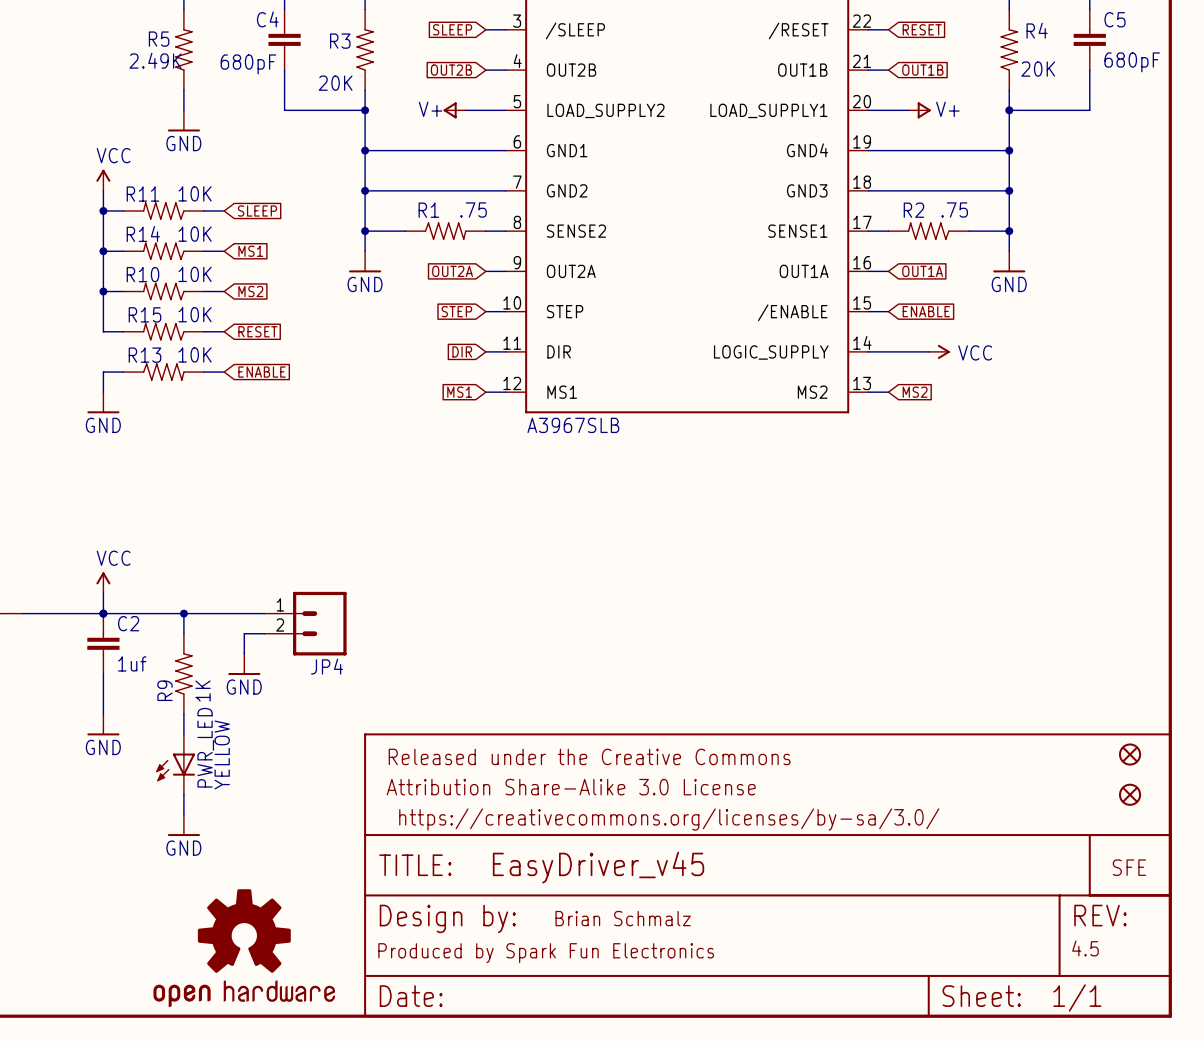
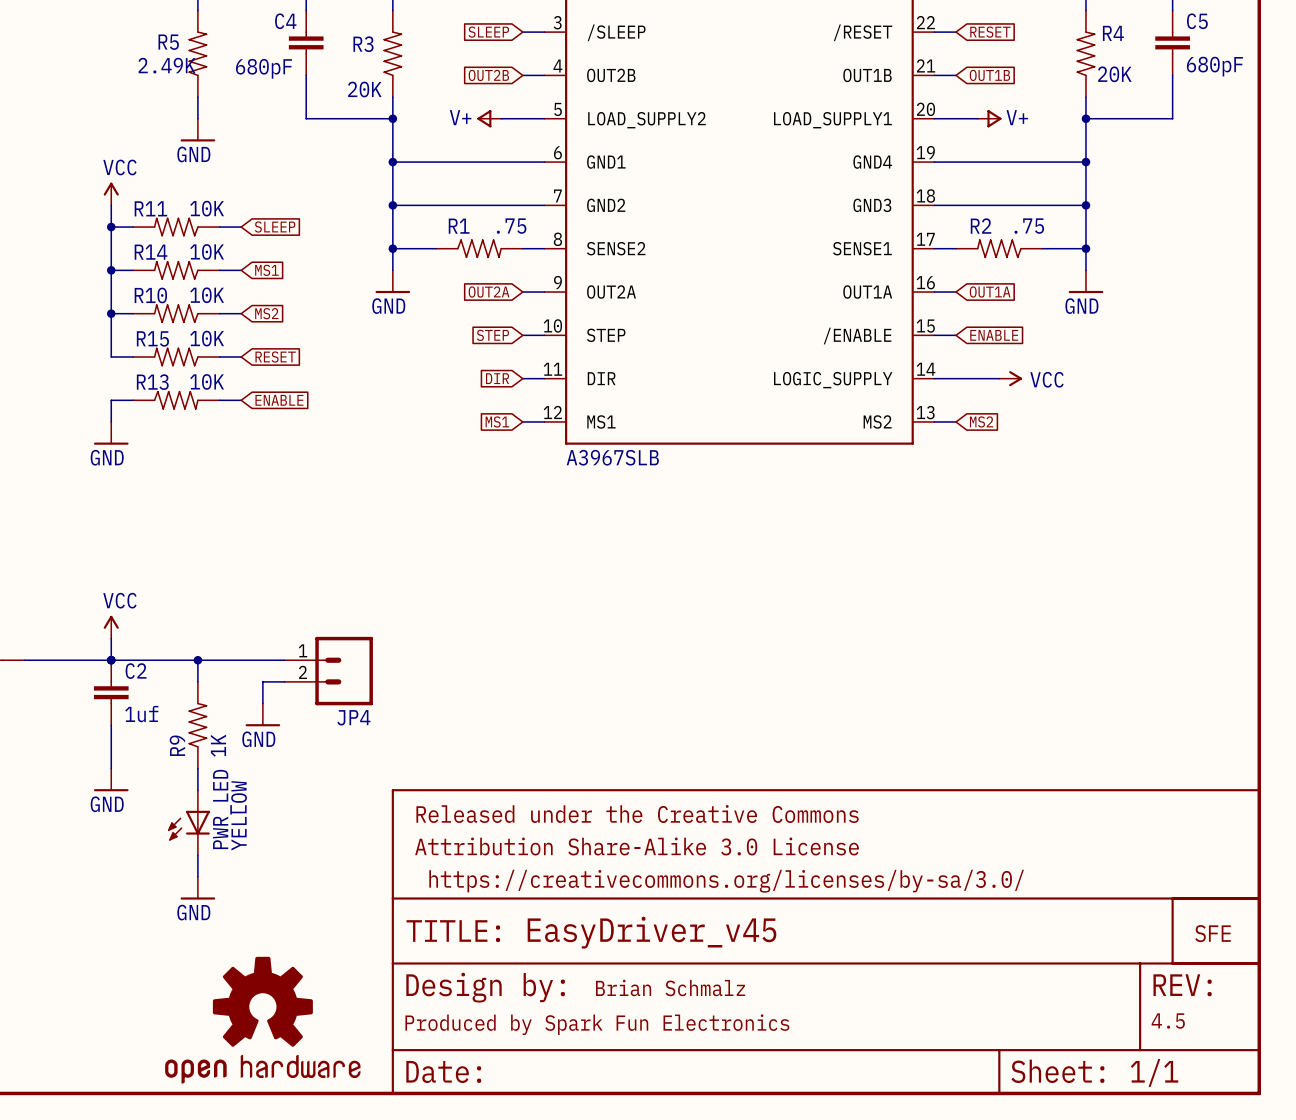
part: (1130, 754) -> none
part: (1130, 794) -> none

